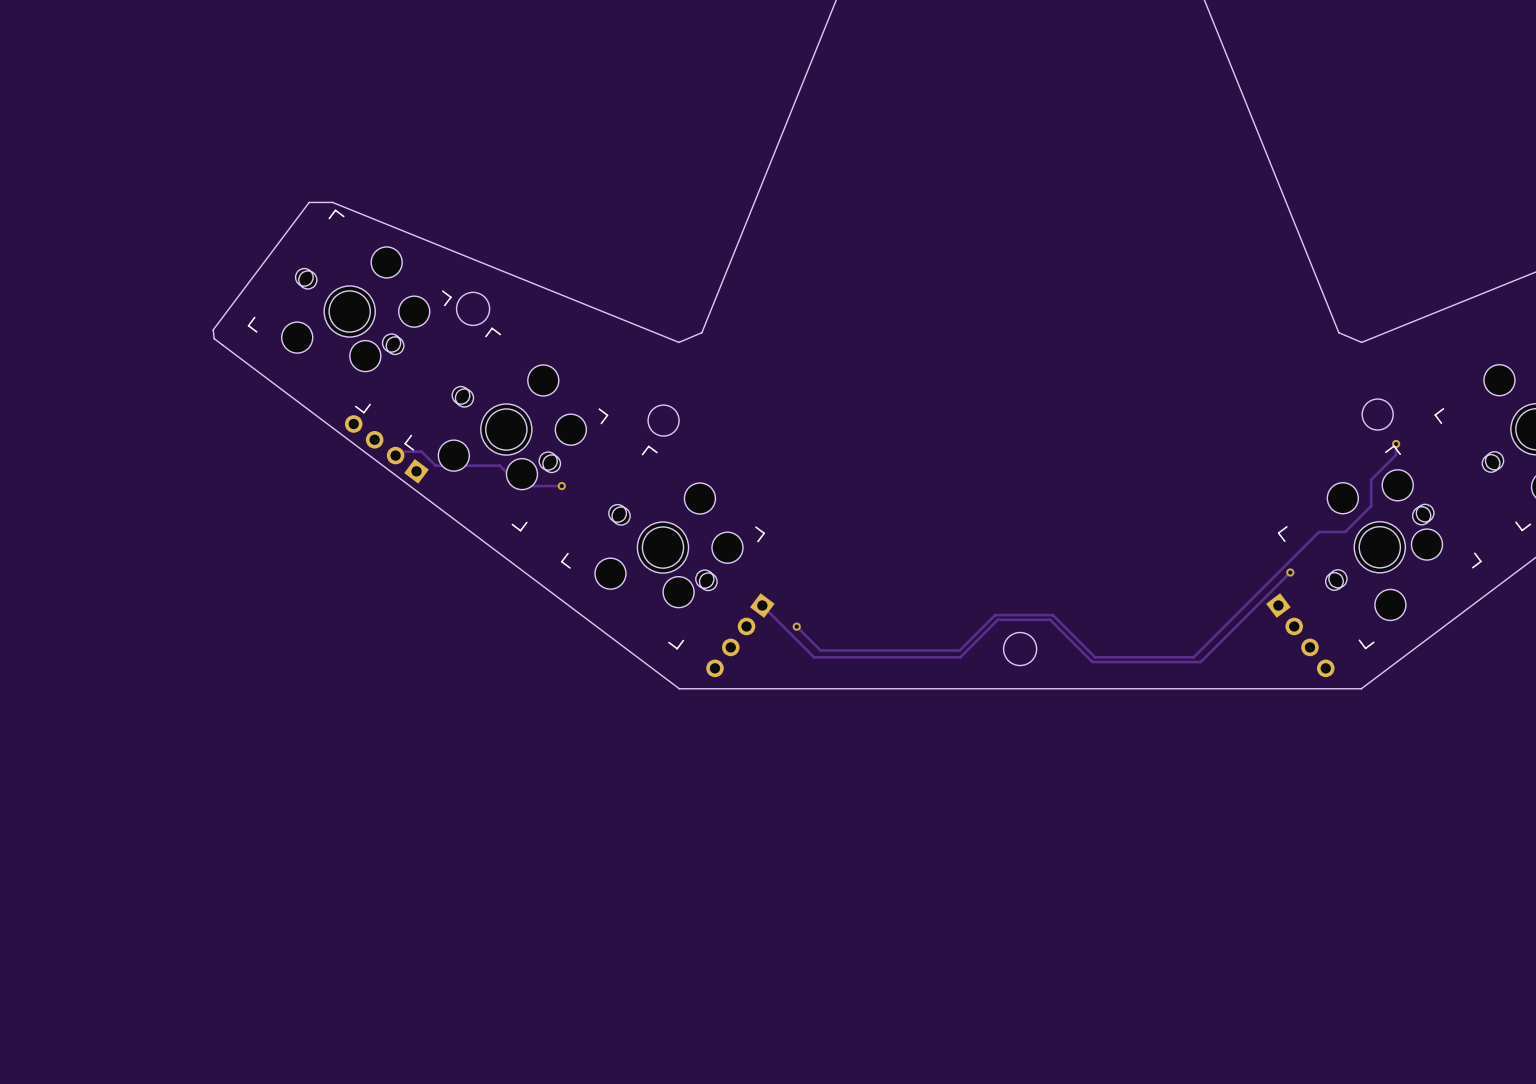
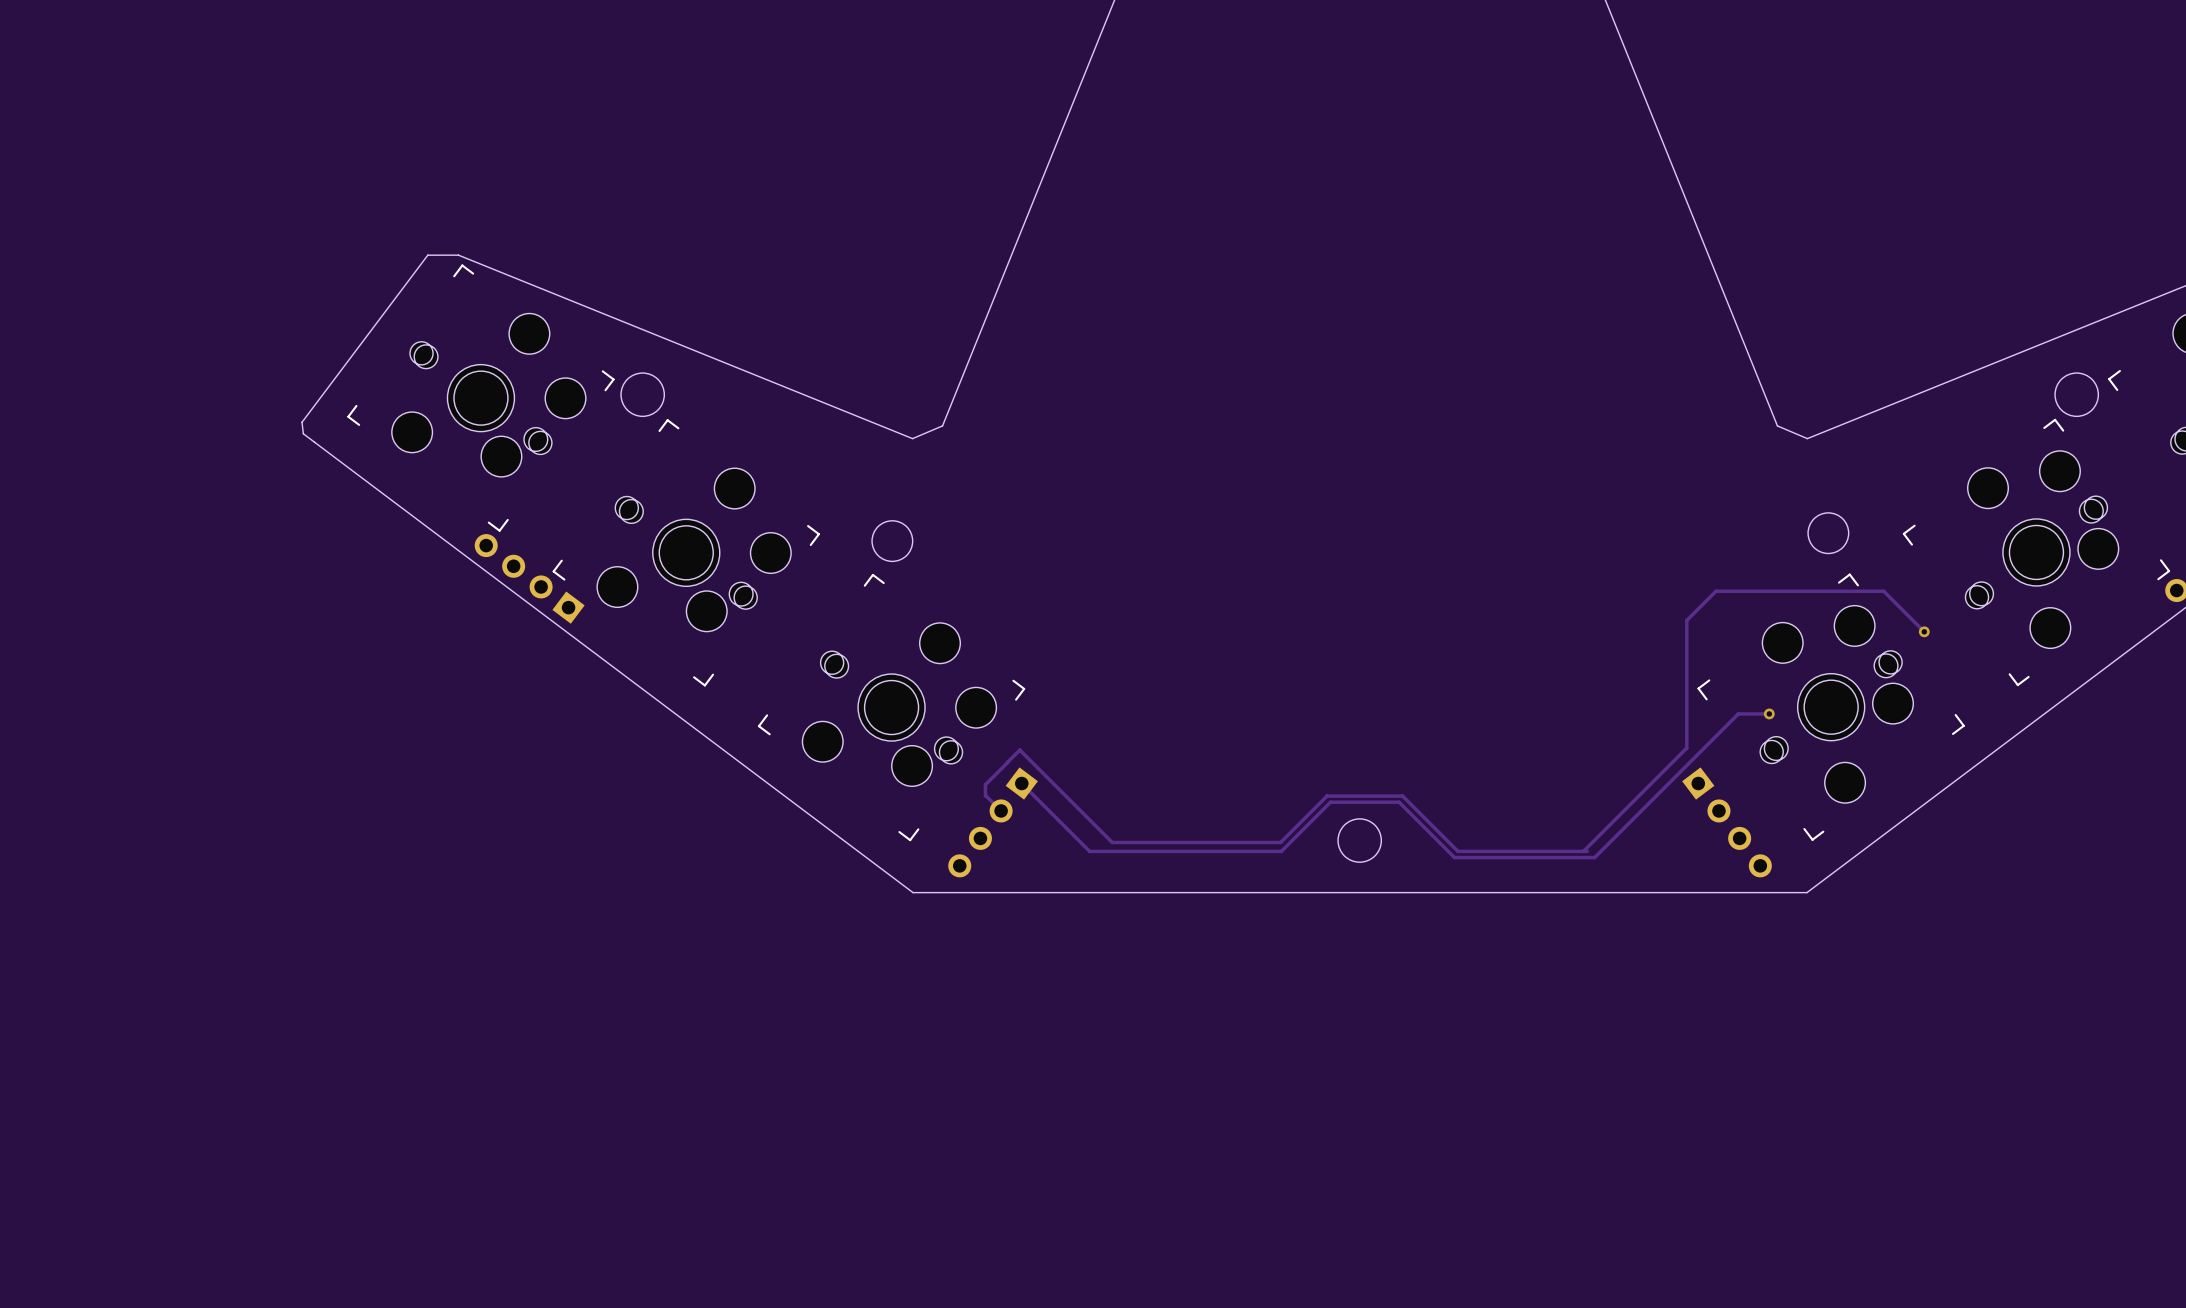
track: (1396, 443) (1396, 454) (1371, 479) (1371, 506) (1345, 532) (1318, 532) (1193, 657) -> none
via: (1396, 443) -> none
track: (395, 455) (399, 451) (421, 451) (435, 465) (499, 465) (520, 486) (561, 486) -> none
via: (561, 486) -> none
track: none -> (1924, 631) (1883, 591) (1715, 591) (1686, 620) (1686, 748) (1583, 851)
via: none -> (1924, 631)
track: (1290, 572) (1199, 662) -> (1769, 713) (1738, 713) (1594, 857)
via position: (1290, 572) -> (1769, 713)
track: (796, 626) (820, 650) (831, 650) -> (1001, 810) (985, 795) (985, 784) (1019, 750) (1112, 842)
via: (796, 626) -> none

